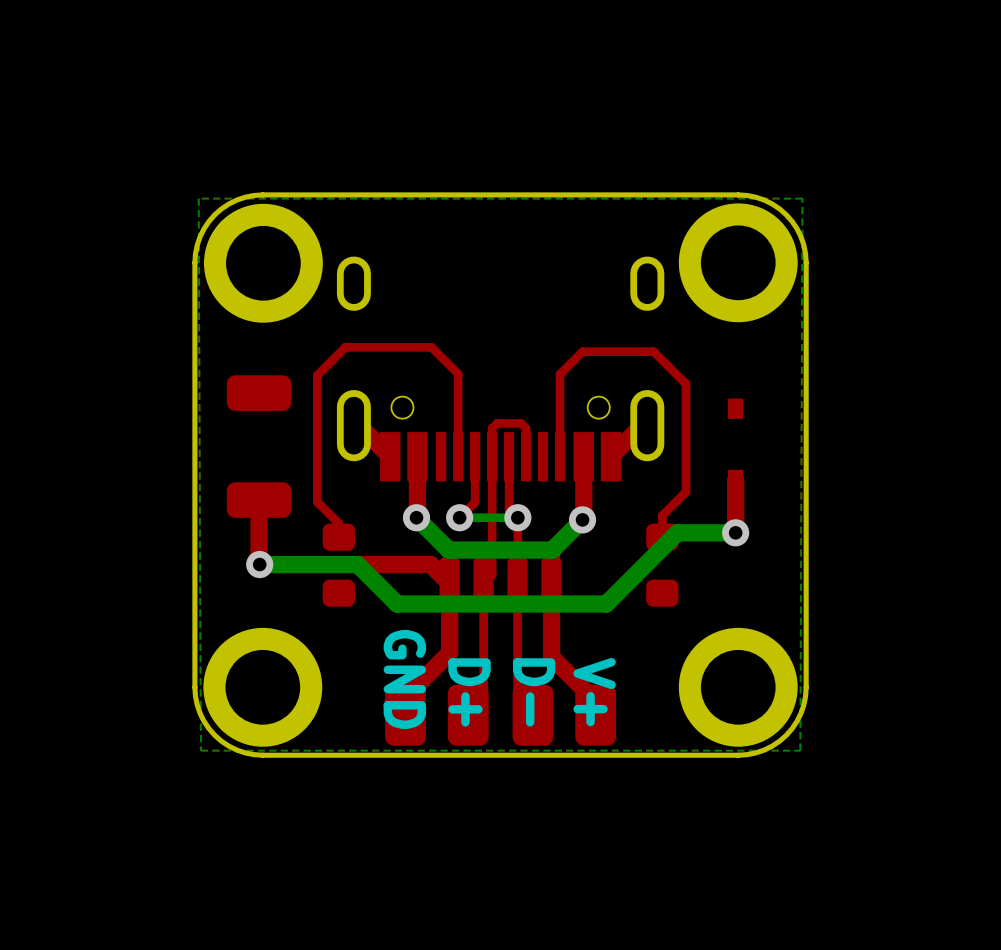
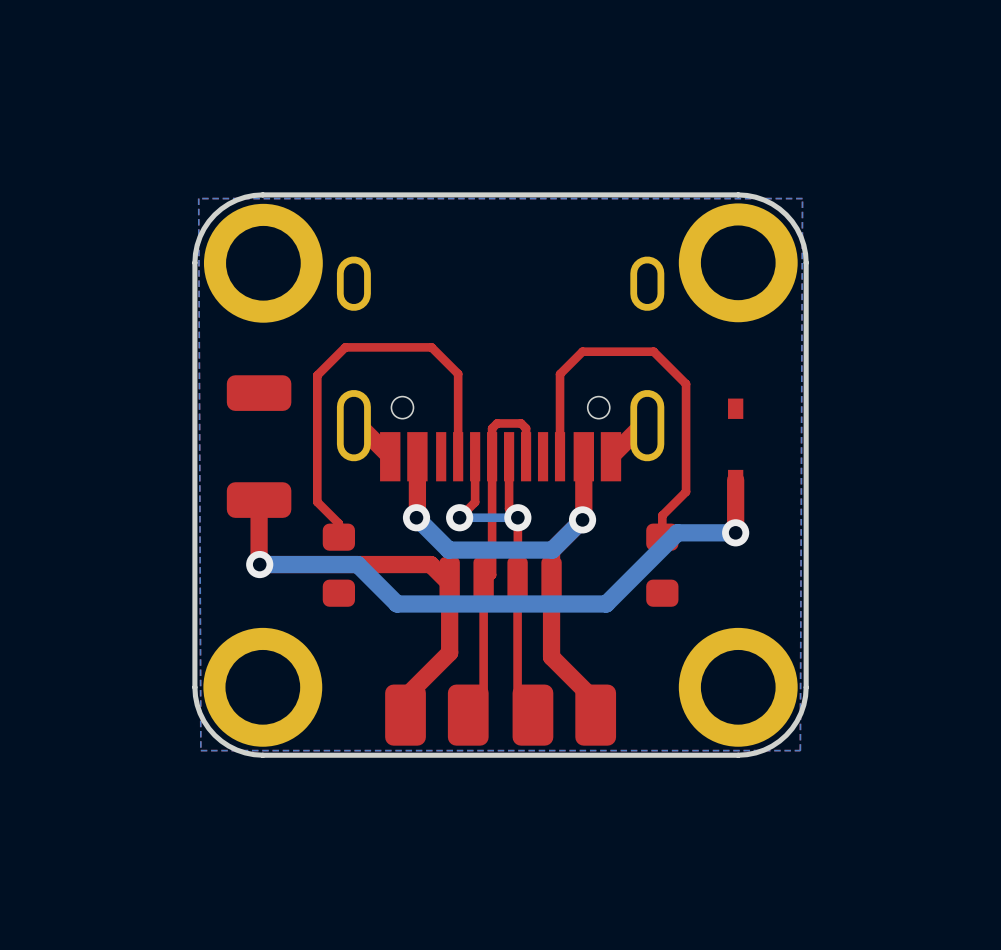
text: GND (404, 679) -> none
text: D+ (469, 692) -> none
text: D- (534, 692) -> none
text: V+ (594, 692) -> none

